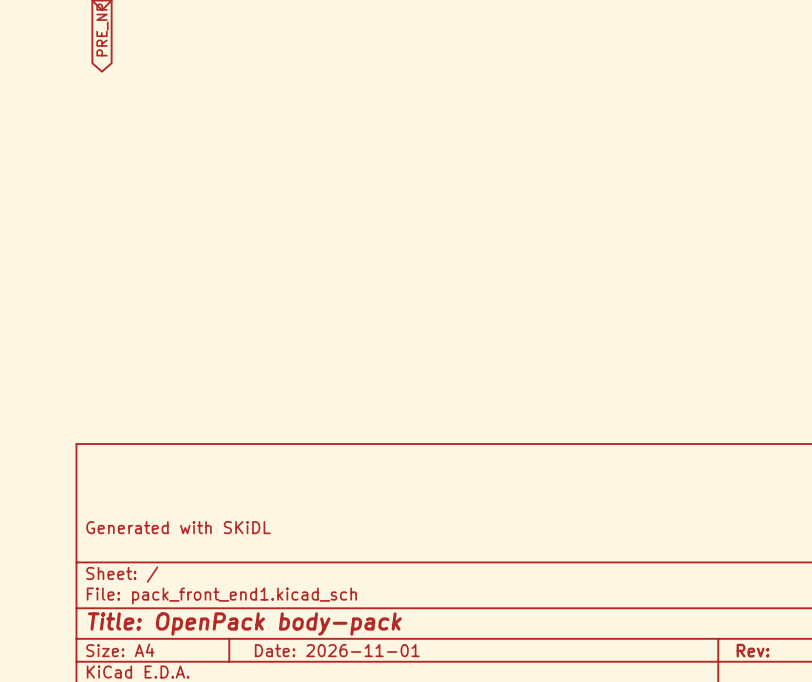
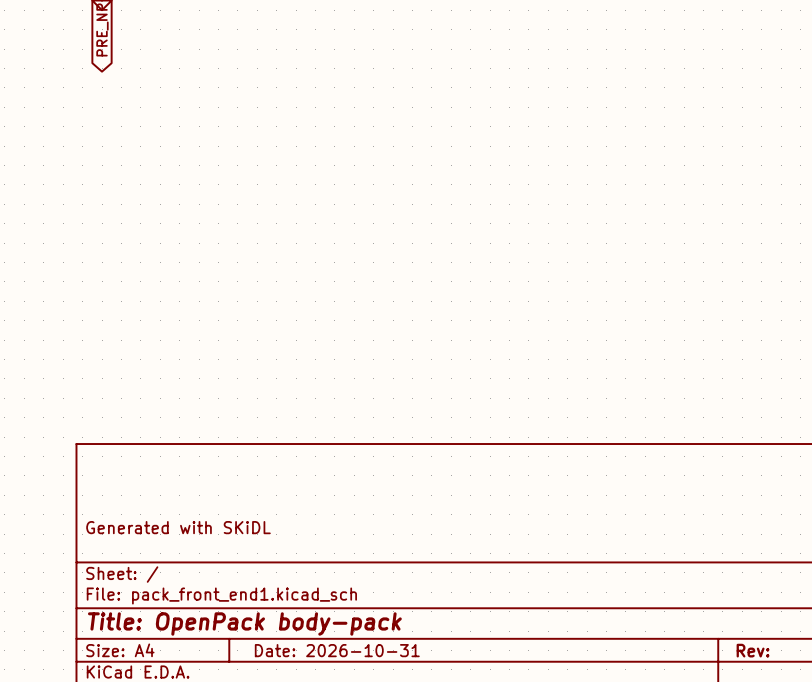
title block: Date: 2026-11-01 (337, 650) -> Date: 2026-10-31 (337, 650)

